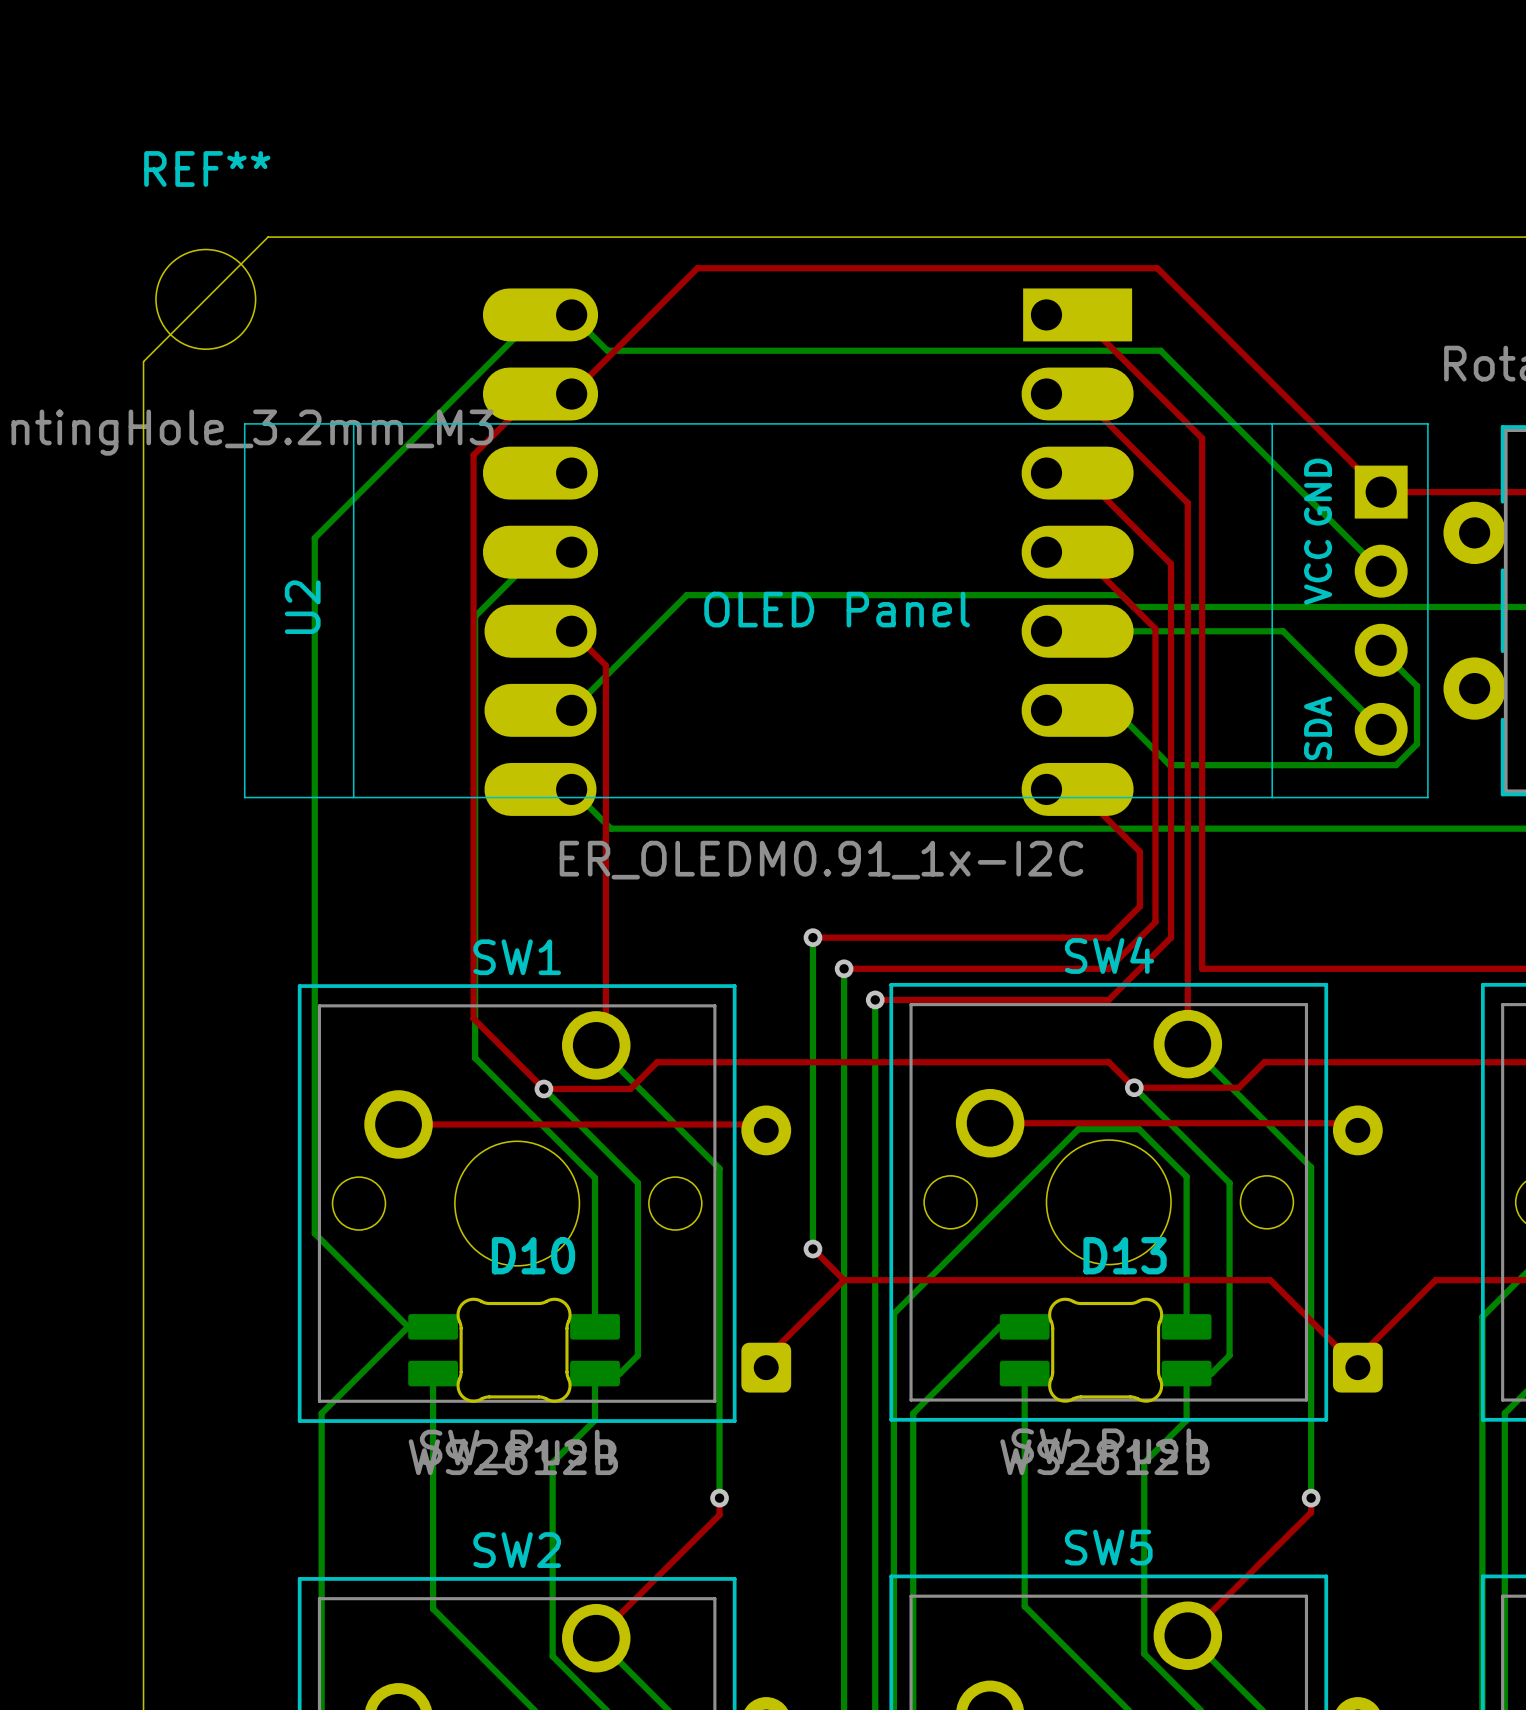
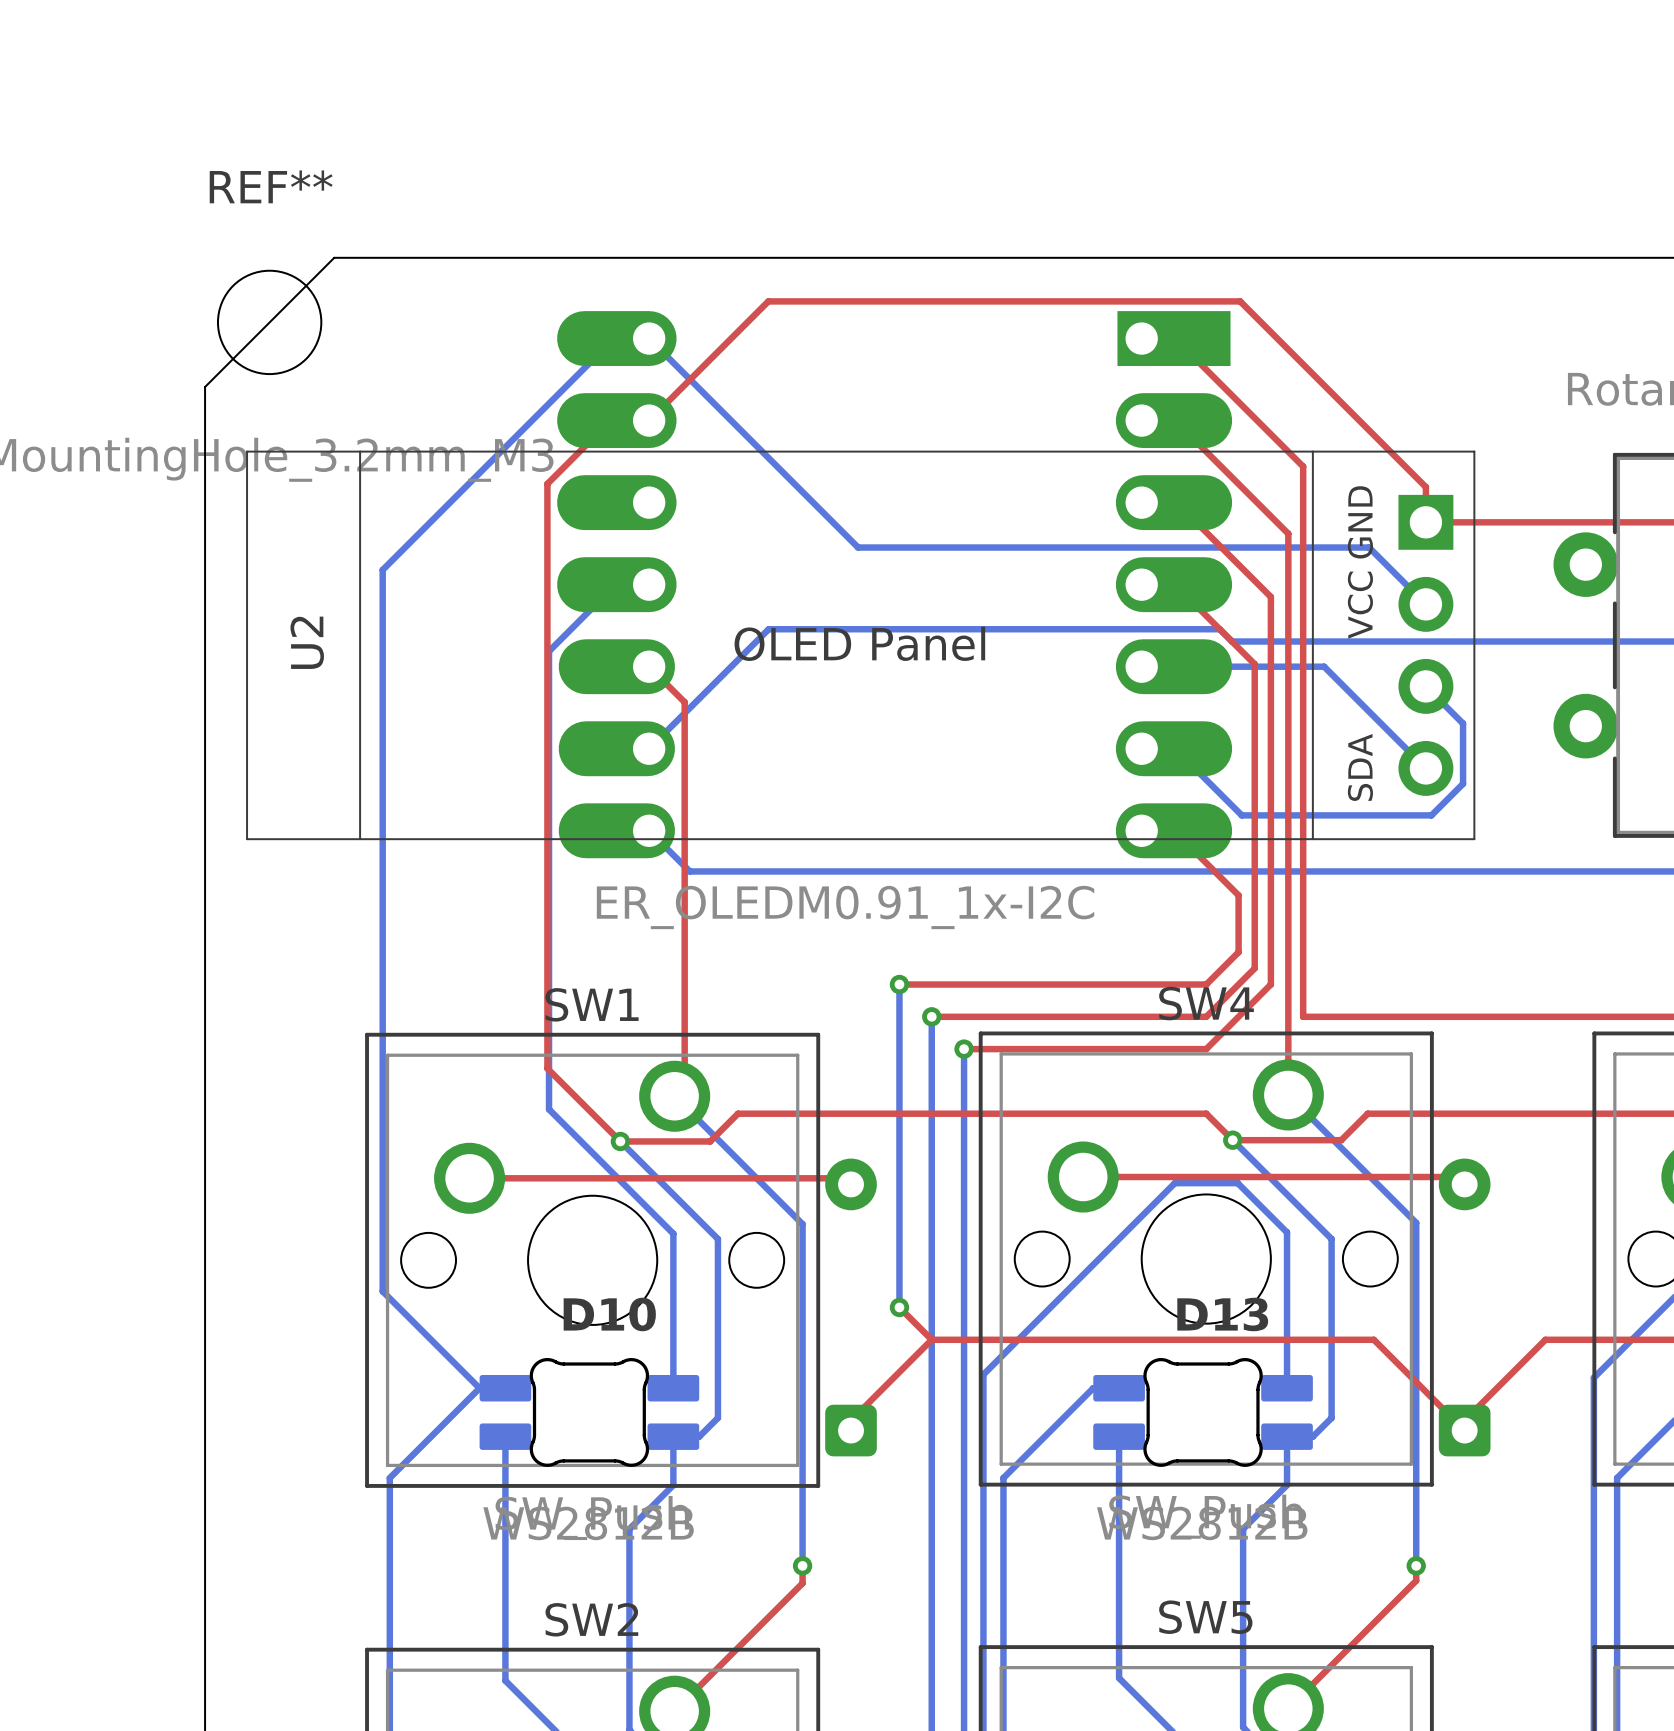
top track: (686, 279) (697, 268) (1157, 268) (1381, 492) -> (768, 301) (1240, 301) (1425, 487) (1425, 522) (1488, 522)
bottom track: (607, 350) (1160, 350) (1381, 571) -> (686, 375) (858, 547) (1369, 547) (1425, 604)
U2 position: (836, 610) -> (860, 645)
bottom track: (1222, 631) (1283, 631) (1381, 729) -> (1324, 666) (1425, 768)
bottom track: (1381, 650) (1417, 686) (1417, 744) (1396, 765) (1169, 765) (1114, 710) (1078, 710) -> (1425, 686) (1463, 723) (1463, 783) (1431, 815) (1241, 815) (1175, 748)

